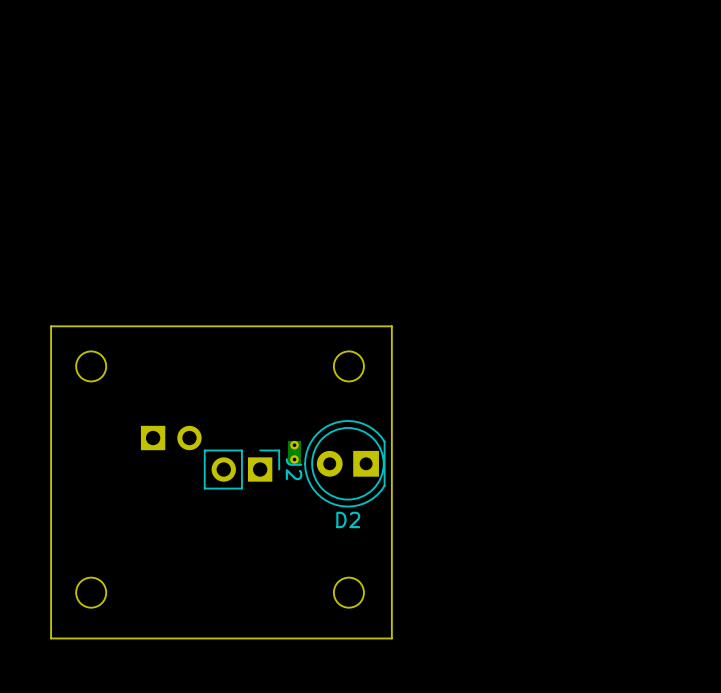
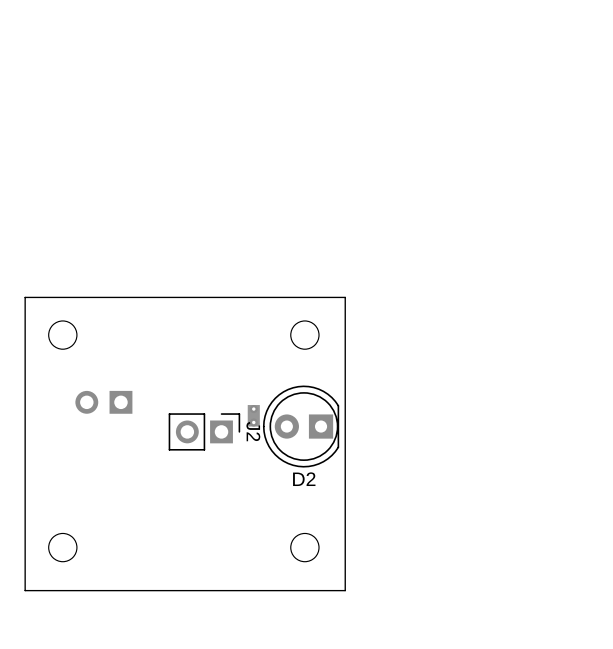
part rotation: 0° (171, 438) -> 180° (103, 402)

